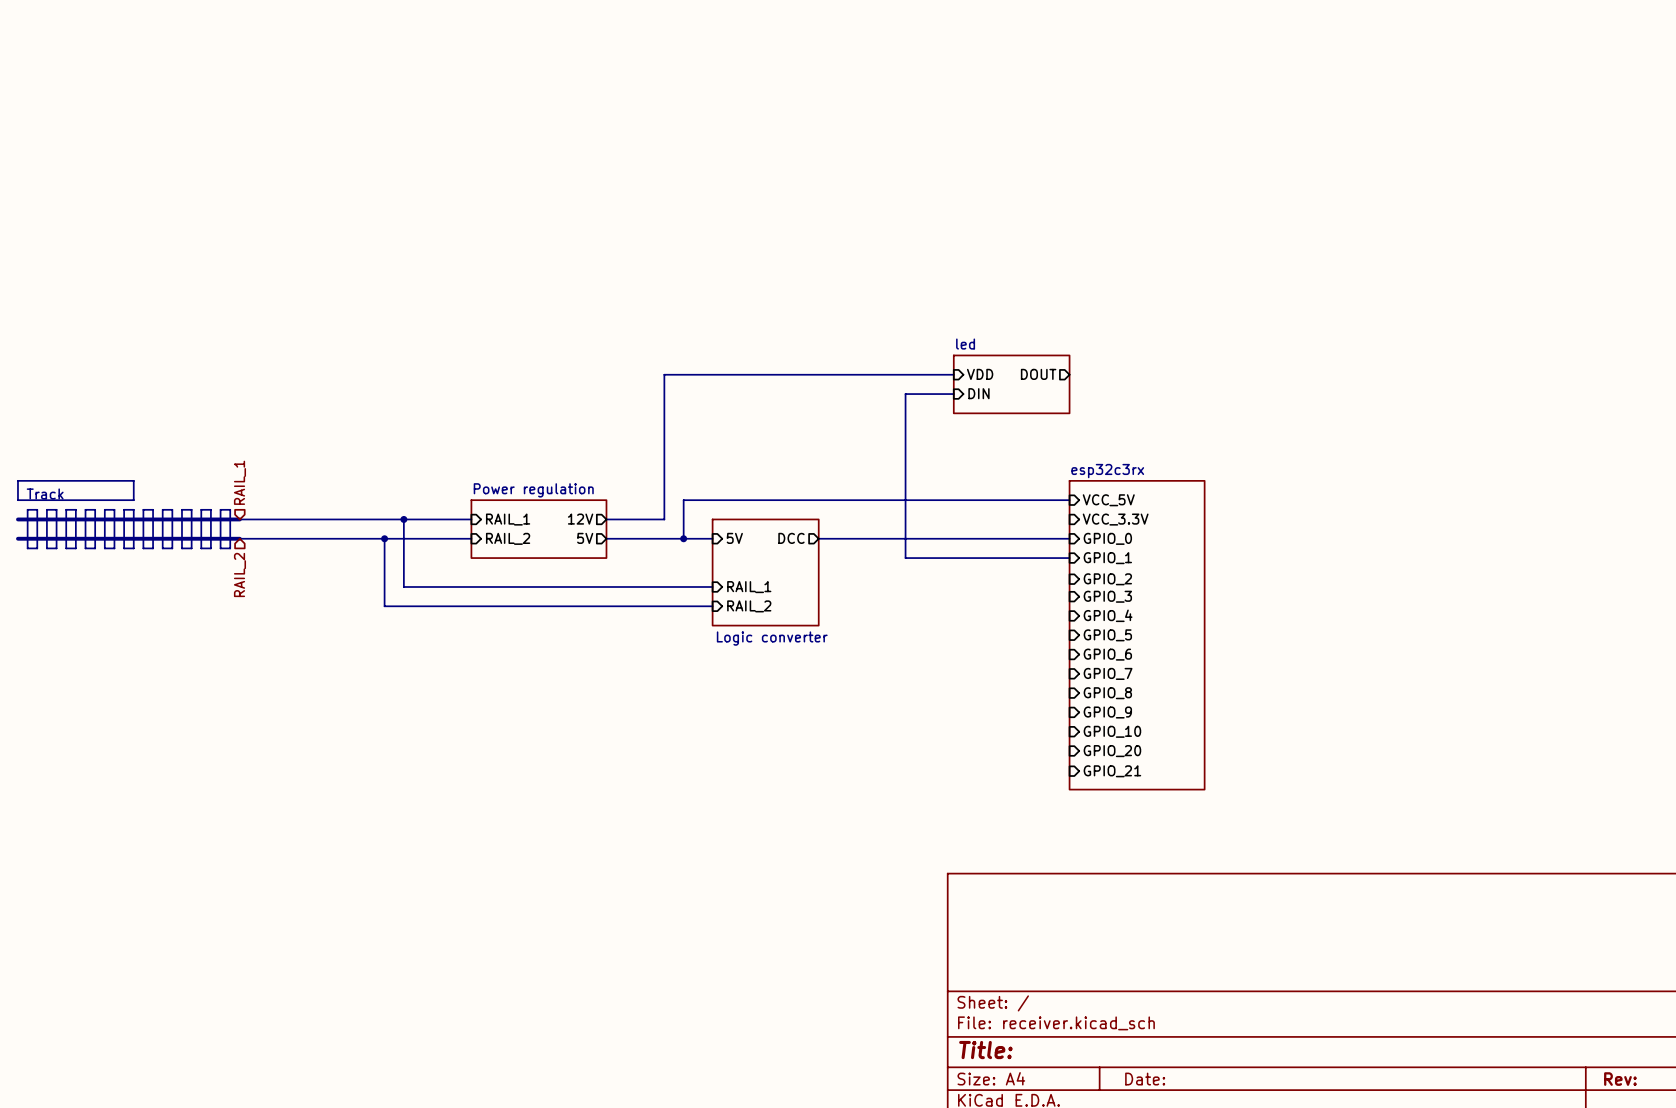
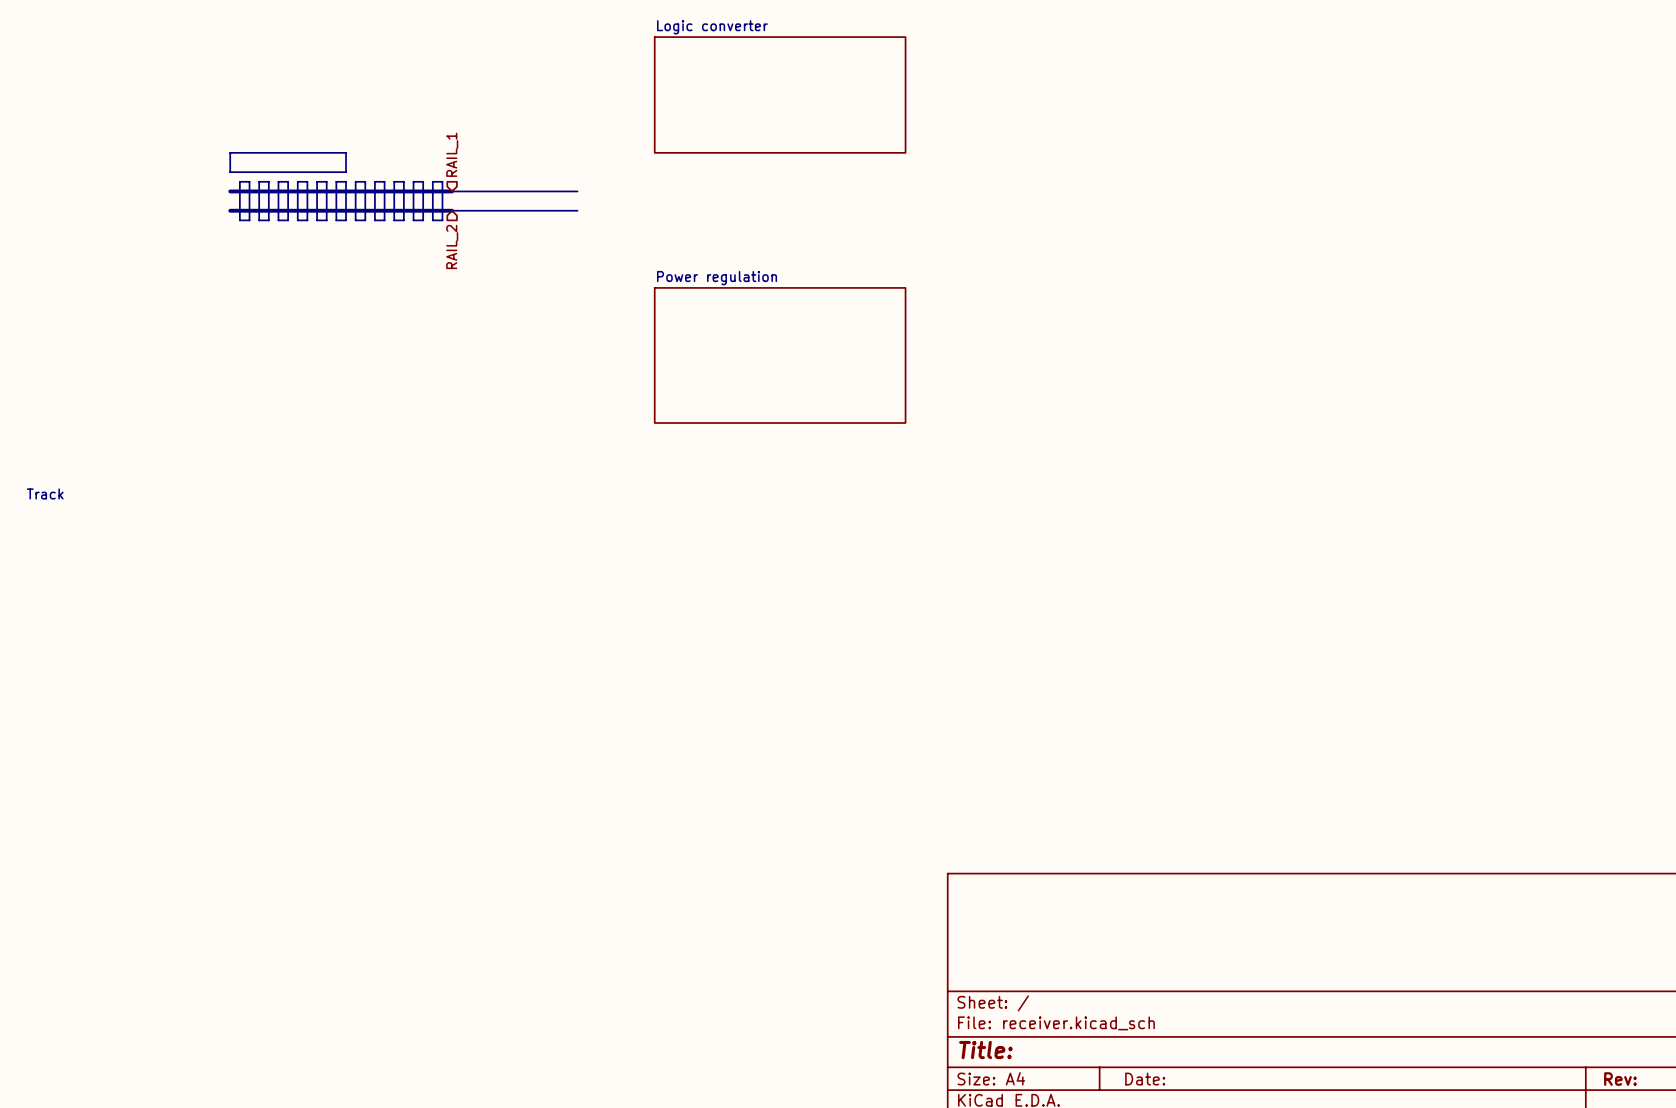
sheet Logic converter: none -> (780, 94)
line: none -> (230, 152) (345, 152) (345, 172) (230, 172) (230, 152)
hierarchical label: none -> RAIL_1 (452, 154)
line: none -> (239, 181) (249, 181) (249, 220) (239, 220) (239, 181)
line: none -> (259, 181) (268, 181) (268, 220) (259, 220) (259, 181)
line: none -> (278, 181) (288, 181) (288, 220) (278, 220) (278, 181)
line: none -> (297, 181) (307, 181) (307, 220) (297, 220) (297, 181)
line: none -> (317, 181) (326, 181) (326, 220) (317, 220) (317, 181)
line: none -> (336, 181) (345, 181) (345, 220) (336, 220) (336, 181)
line: none -> (355, 181) (365, 181) (365, 220) (355, 220) (355, 181)
line: none -> (374, 181) (384, 181) (384, 220) (374, 220) (374, 181)
line: none -> (394, 181) (403, 181) (403, 220) (394, 220) (394, 181)
line: none -> (413, 181) (423, 181) (423, 220) (413, 220) (413, 181)
line: none -> (432, 181) (442, 181) (442, 220) (432, 220) (432, 181)
line: none -> (230, 191) (452, 191)
wire: none -> (452, 191) (577, 191)
line: none -> (230, 210) (452, 210)
wire: none -> (452, 210) (577, 210)
hierarchical label: none -> RAIL_2 (452, 246)
sheet Power regulation: none -> (780, 355)
wire: (953, 374) (664, 374) (664, 519) (606, 519) -> none
sheet pin: VDD (980, 374) -> none
sheet pin: DOUT (1038, 374) -> none
sheet led: (1011, 384) -> none
sheet pin: DIN (978, 393) -> none
wire: (953, 394) (905, 394) (905, 558) (1069, 558) -> none
line: (17, 480) (133, 480) (133, 500) (17, 500) (17, 480) -> none
hierarchical label: RAIL_1 (239, 482) -> none
wire: (1069, 500) (683, 500) (683, 538) -> none
sheet pin: VCC_5V (1108, 500) -> none
line: (27, 509) (37, 509) (37, 548) (27, 548) (27, 509) -> none
line: (46, 509) (56, 509) (56, 548) (46, 548) (46, 509) -> none
line: (66, 509) (75, 509) (75, 548) (66, 548) (66, 509) -> none
line: (85, 509) (95, 509) (95, 548) (85, 548) (85, 509) -> none
line: (104, 509) (114, 509) (114, 548) (104, 548) (104, 509) -> none
line: (124, 509) (133, 509) (133, 548) (124, 548) (124, 509) -> none
line: (143, 509) (153, 509) (153, 548) (143, 548) (143, 509) -> none
line: (162, 509) (172, 509) (172, 548) (162, 548) (162, 509) -> none
line: (181, 509) (191, 509) (191, 548) (181, 548) (181, 509) -> none
line: (201, 509) (210, 509) (210, 548) (201, 548) (201, 509) -> none
line: (220, 509) (230, 509) (230, 548) (220, 548) (220, 509) -> none
line: (17, 519) (239, 519) -> none
wire: (239, 519) (471, 519) -> none
wire: (403, 519) (403, 586) (712, 586) -> none
junction: (403, 519) -> none
sheet pin: RAIL_1 (508, 519) -> none
sheet pin: 12V (580, 519) -> none
sheet pin: VCC_3.3V (1115, 519) -> none
sheet Power regulation: (538, 529) -> none
line: (17, 538) (239, 538) -> none
wire: (239, 538) (471, 538) -> none
wire: (384, 538) (384, 606) (712, 606) -> none
junction: (384, 538) -> none
sheet pin: RAIL_2 (508, 538) -> none
sheet pin: 5V (585, 538) -> none
wire: (606, 538) (712, 538) -> none
junction: (683, 538) -> none
sheet pin: 5V (734, 538) -> none
sheet pin: DCC (791, 538) -> none
wire: (818, 538) (1069, 538) -> none
sheet pin: GPIO_0 (1107, 538) -> none
sheet pin: GPIO_1 (1107, 558) -> none
sheet Logic converter: (765, 572) -> none
hierarchical label: RAIL_2 (239, 574) -> none
sheet pin: GPIO_2 (1107, 579) -> none
sheet pin: RAIL_1 (749, 587) -> none
sheet pin: GPIO_3 (1107, 596) -> none
sheet pin: RAIL_2 (749, 606) -> none
sheet pin: GPIO_4 (1108, 615) -> none
sheet pin: GPIO_5 (1107, 635) -> none
sheet esp32c3rx: (1137, 635) -> none
sheet pin: GPIO_6 (1107, 654) -> none
sheet pin: GPIO_7 (1108, 673) -> none
sheet pin: GPIO_8 (1107, 693) -> none
sheet pin: GPIO_9 (1107, 712) -> none
sheet pin: GPIO_10 (1112, 731) -> none
sheet pin: GPIO_20 (1112, 751) -> none
sheet pin: GPIO_21 (1112, 771) -> none

